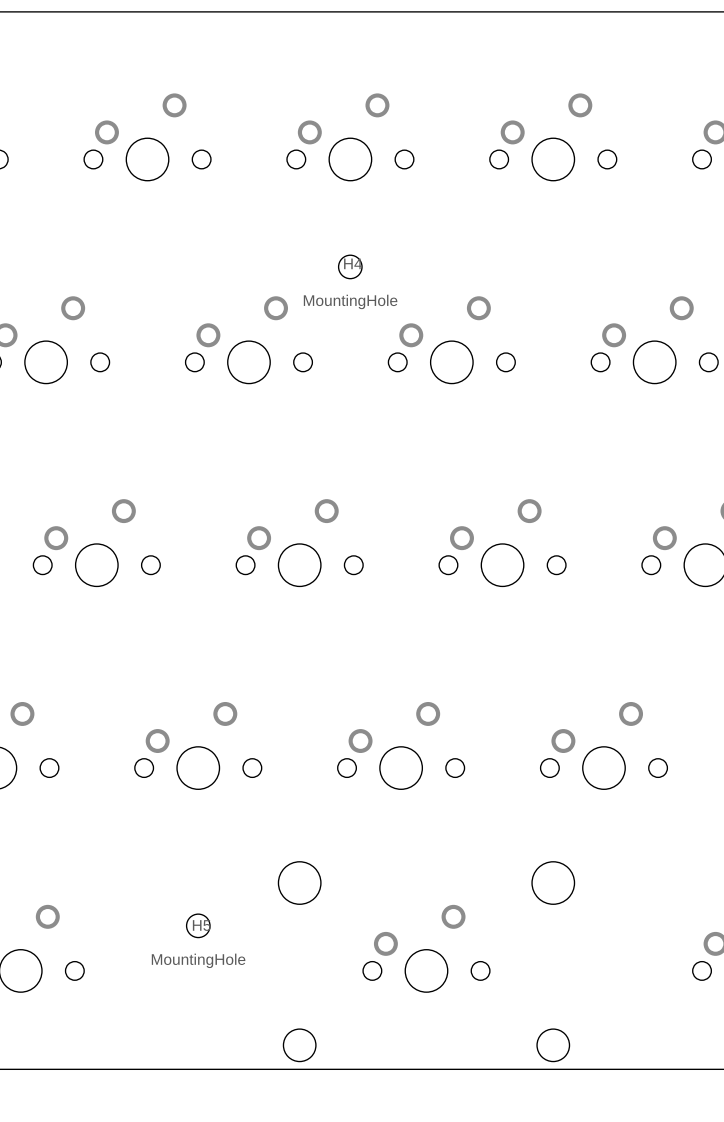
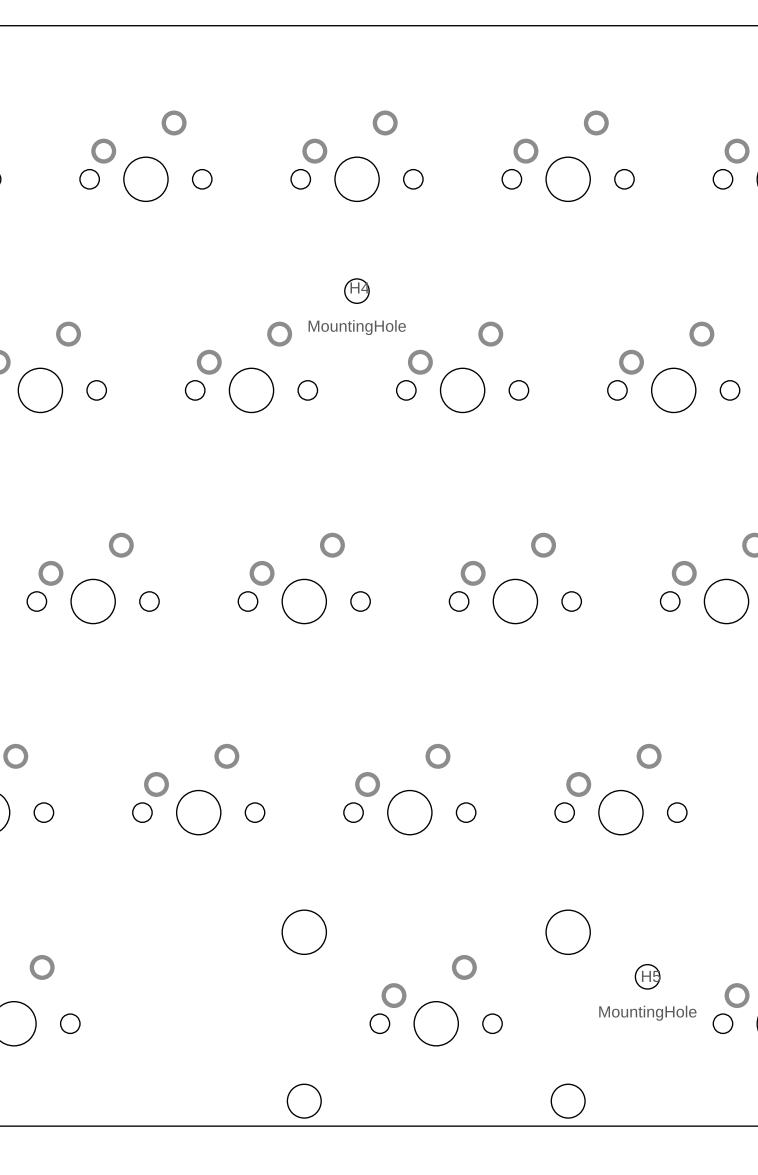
H5 position: (198, 925) -> (647, 976)

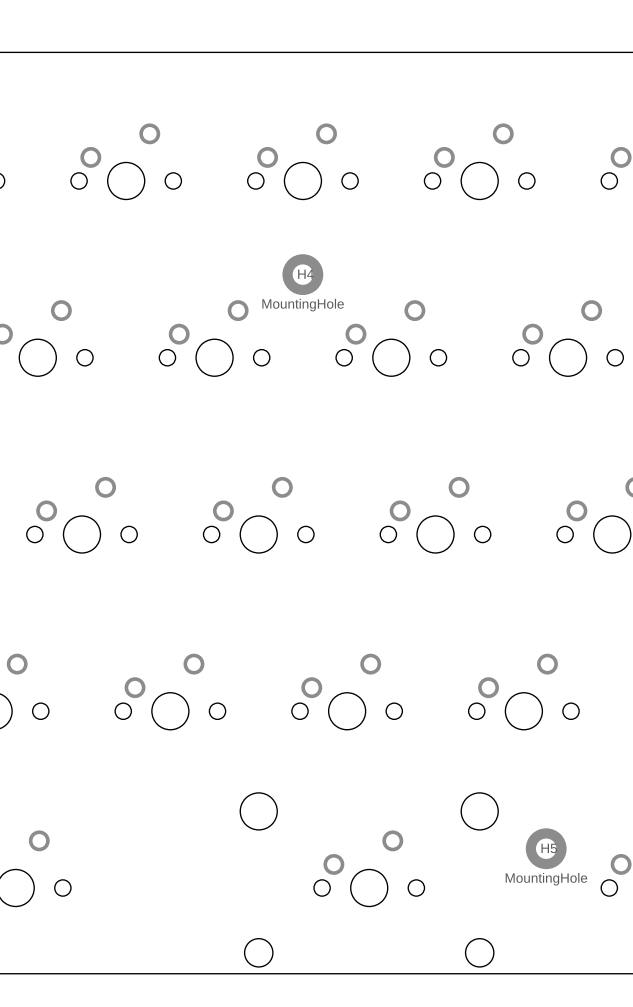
H4 footprint: [344, 278, 370, 304] -> [282, 254, 324, 296]
H5 footprint: [635, 964, 660, 990] -> [525, 828, 567, 870]

